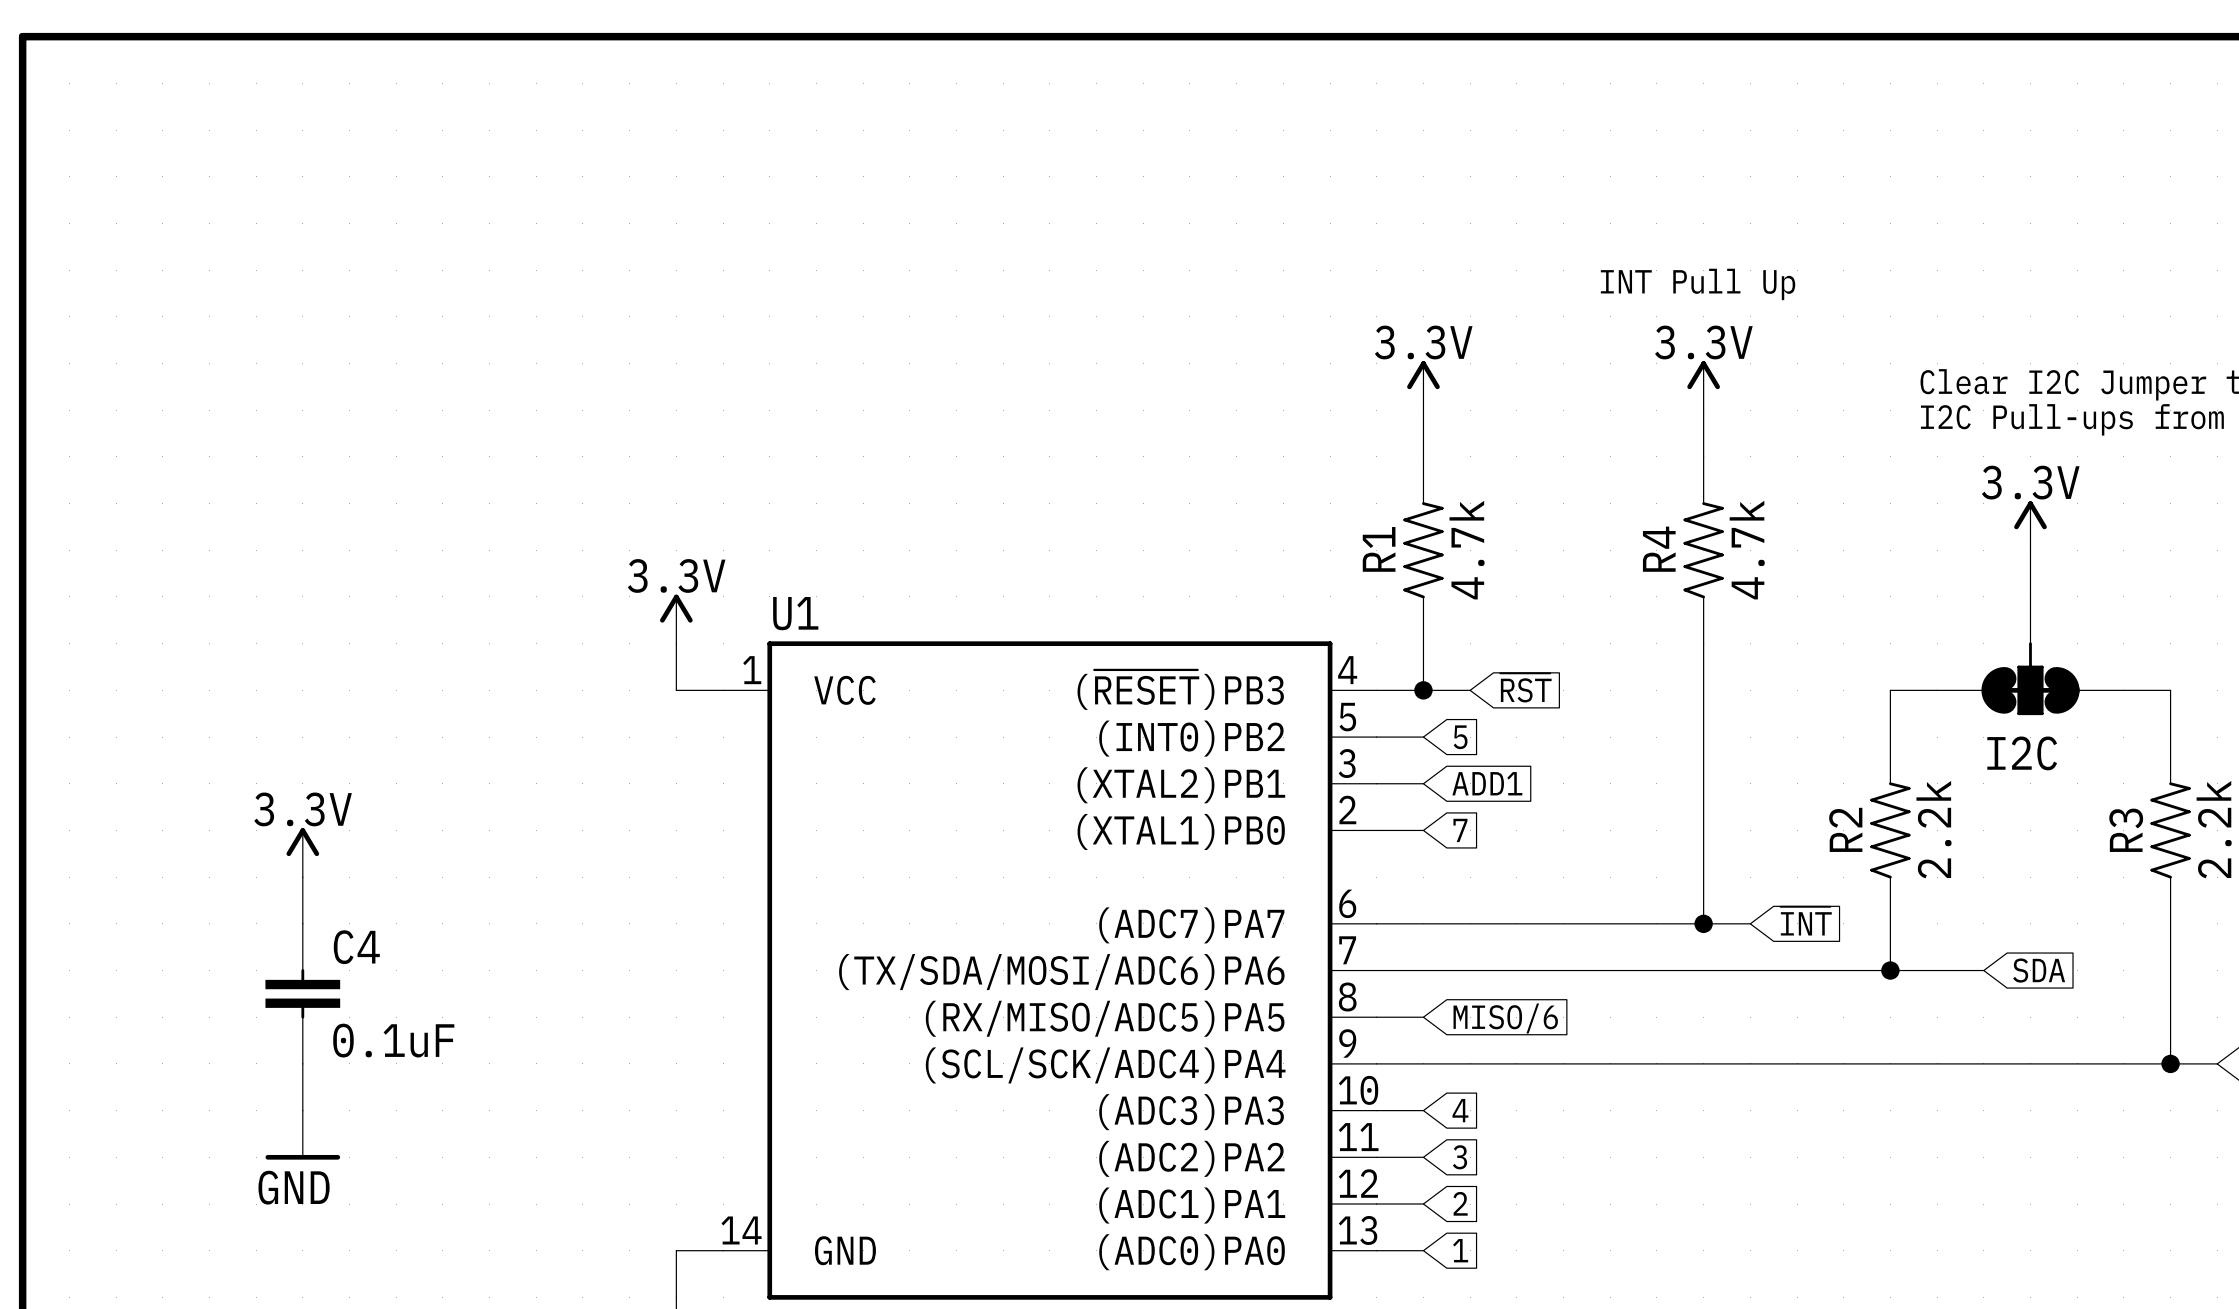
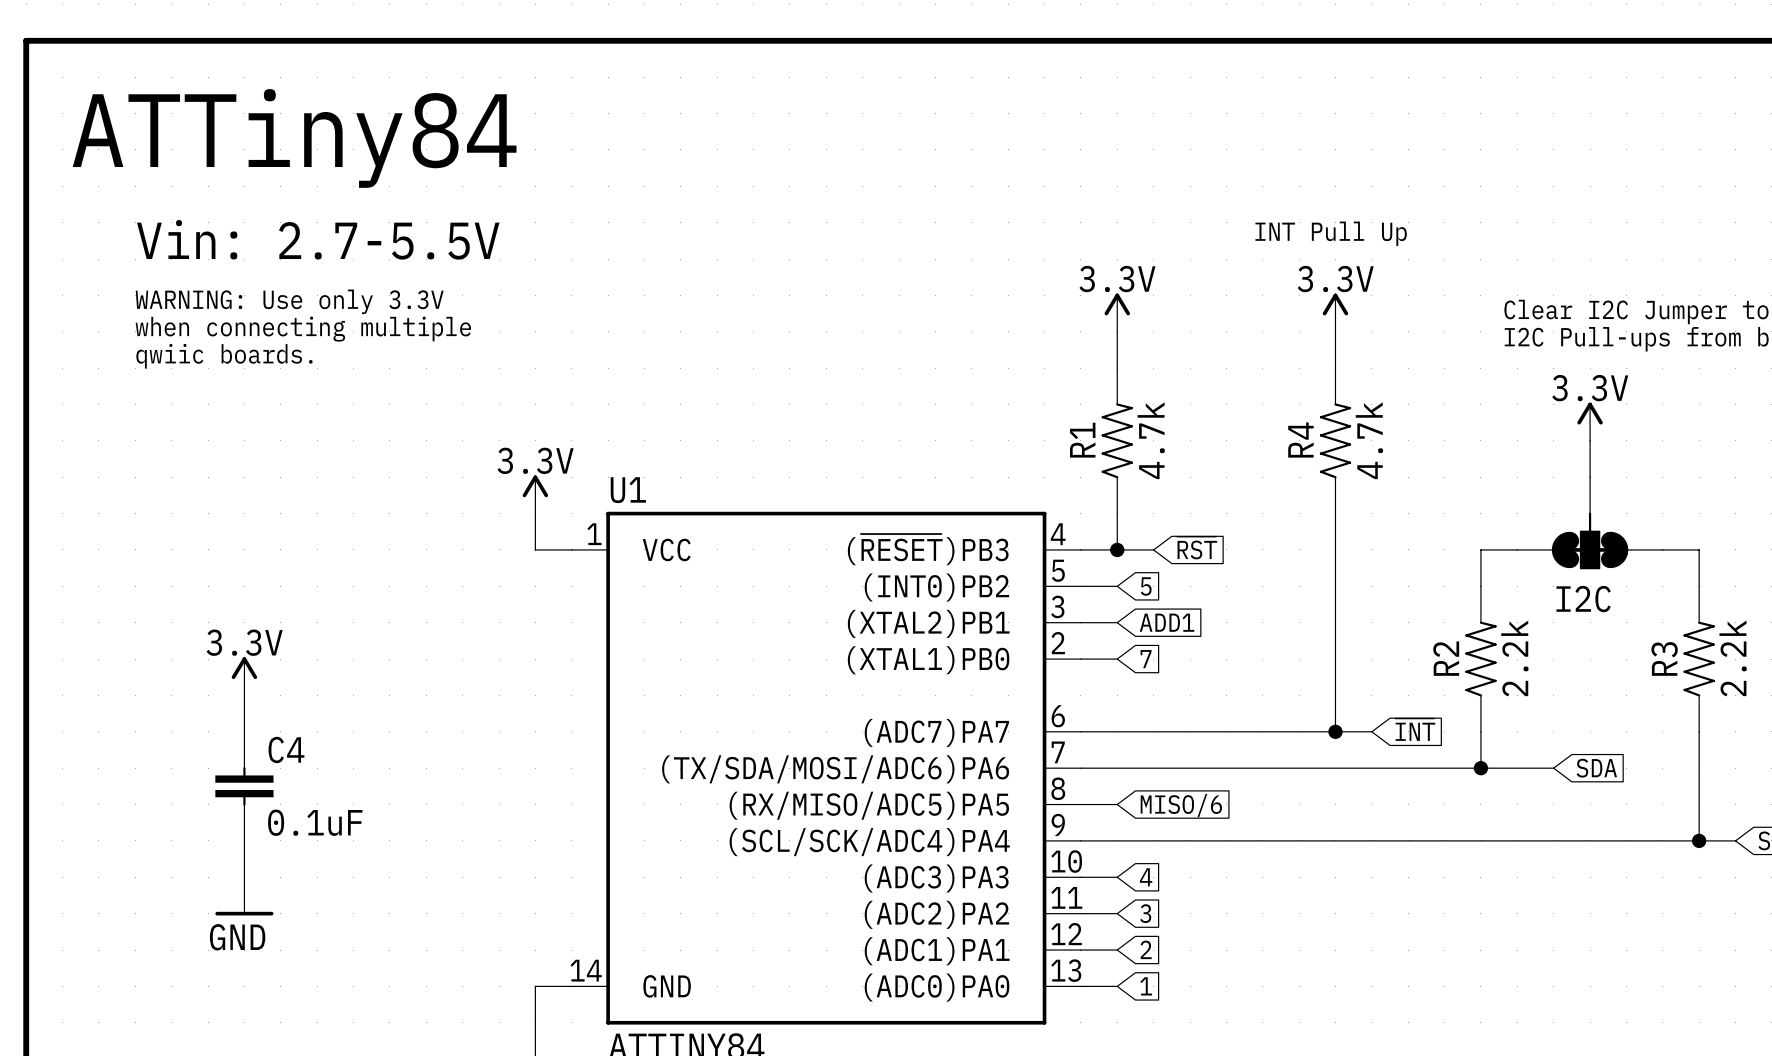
text: none -> ATTiny84 (294, 138)
text: none -> Vin: 2.7-5.5V (318, 239)
text: none -> WARNING: Use only 3.3V (289, 301)
text: none -> when connecting multiple (303, 329)
text: none -> qwiic boards. (224, 356)

